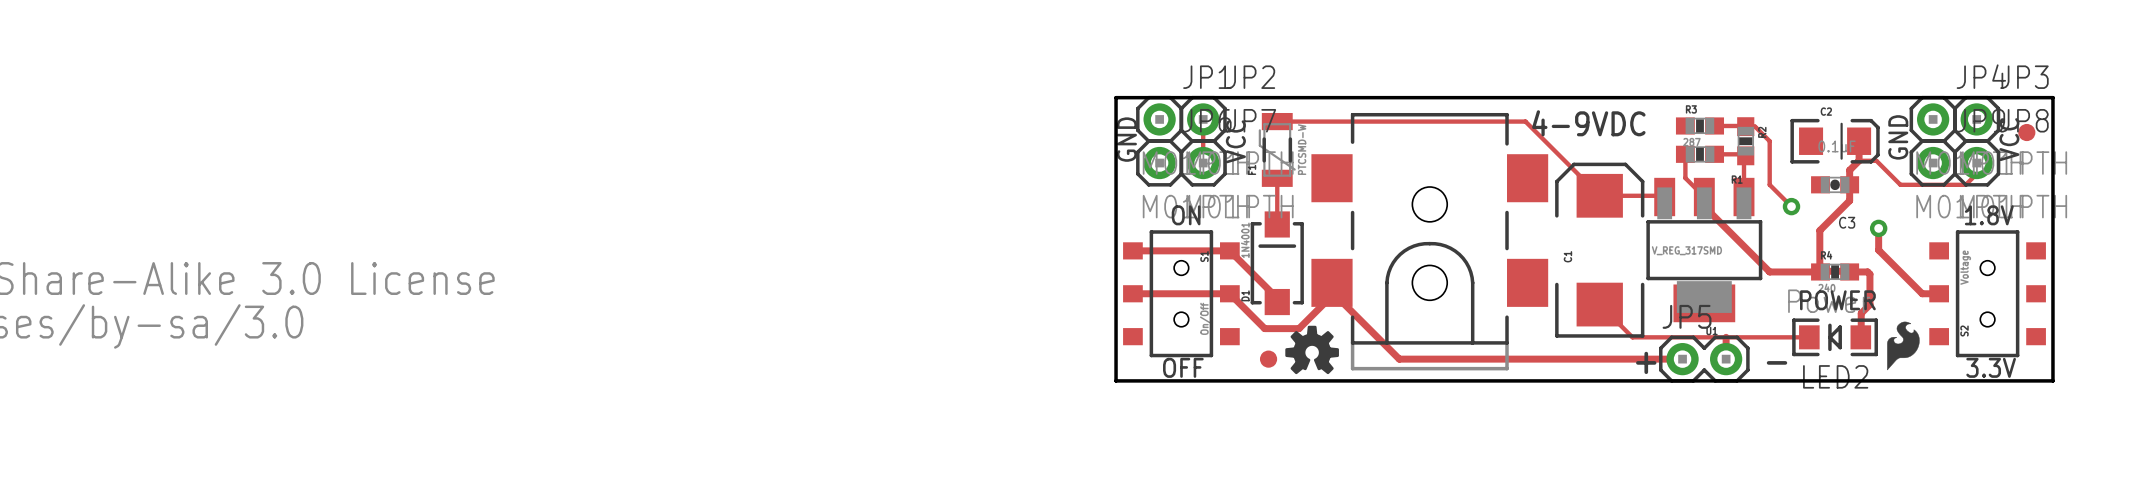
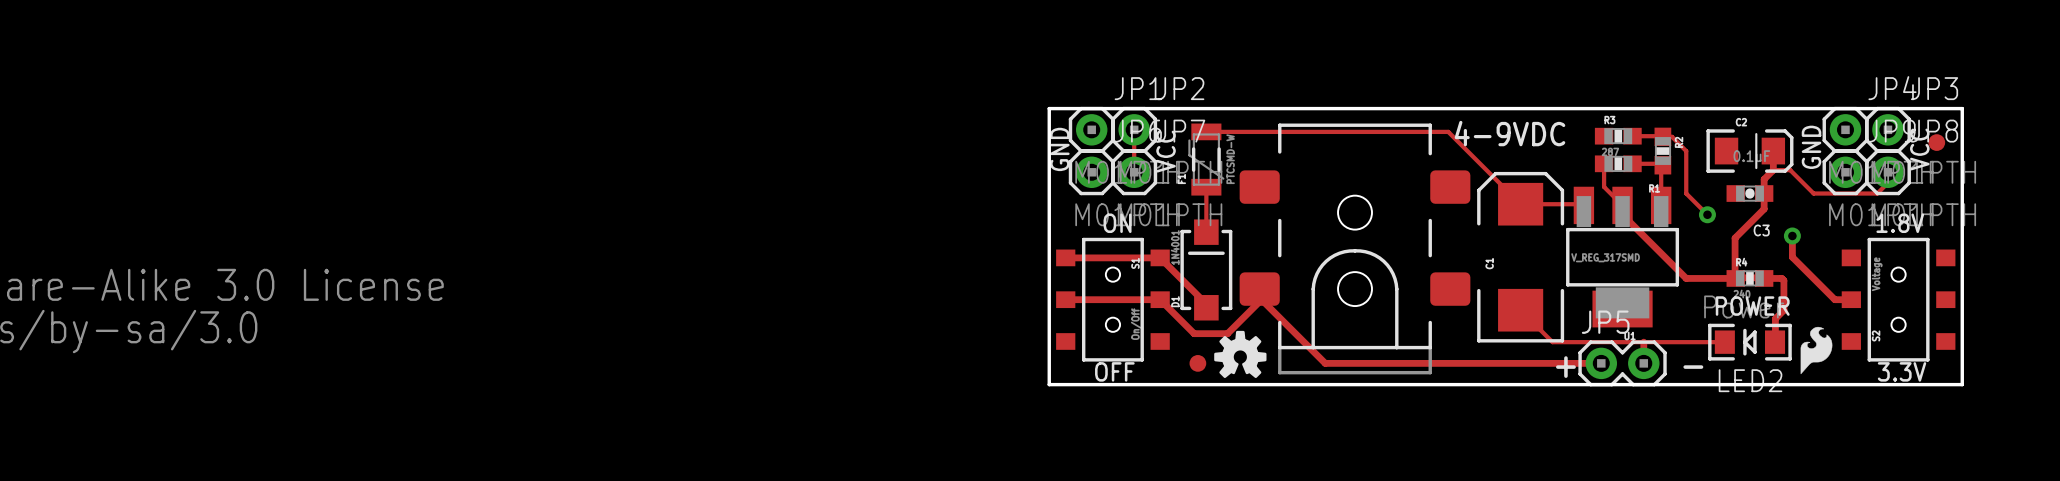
part footprint: [1311, 112, 1549, 371] -> [1239, 123, 1471, 375]

